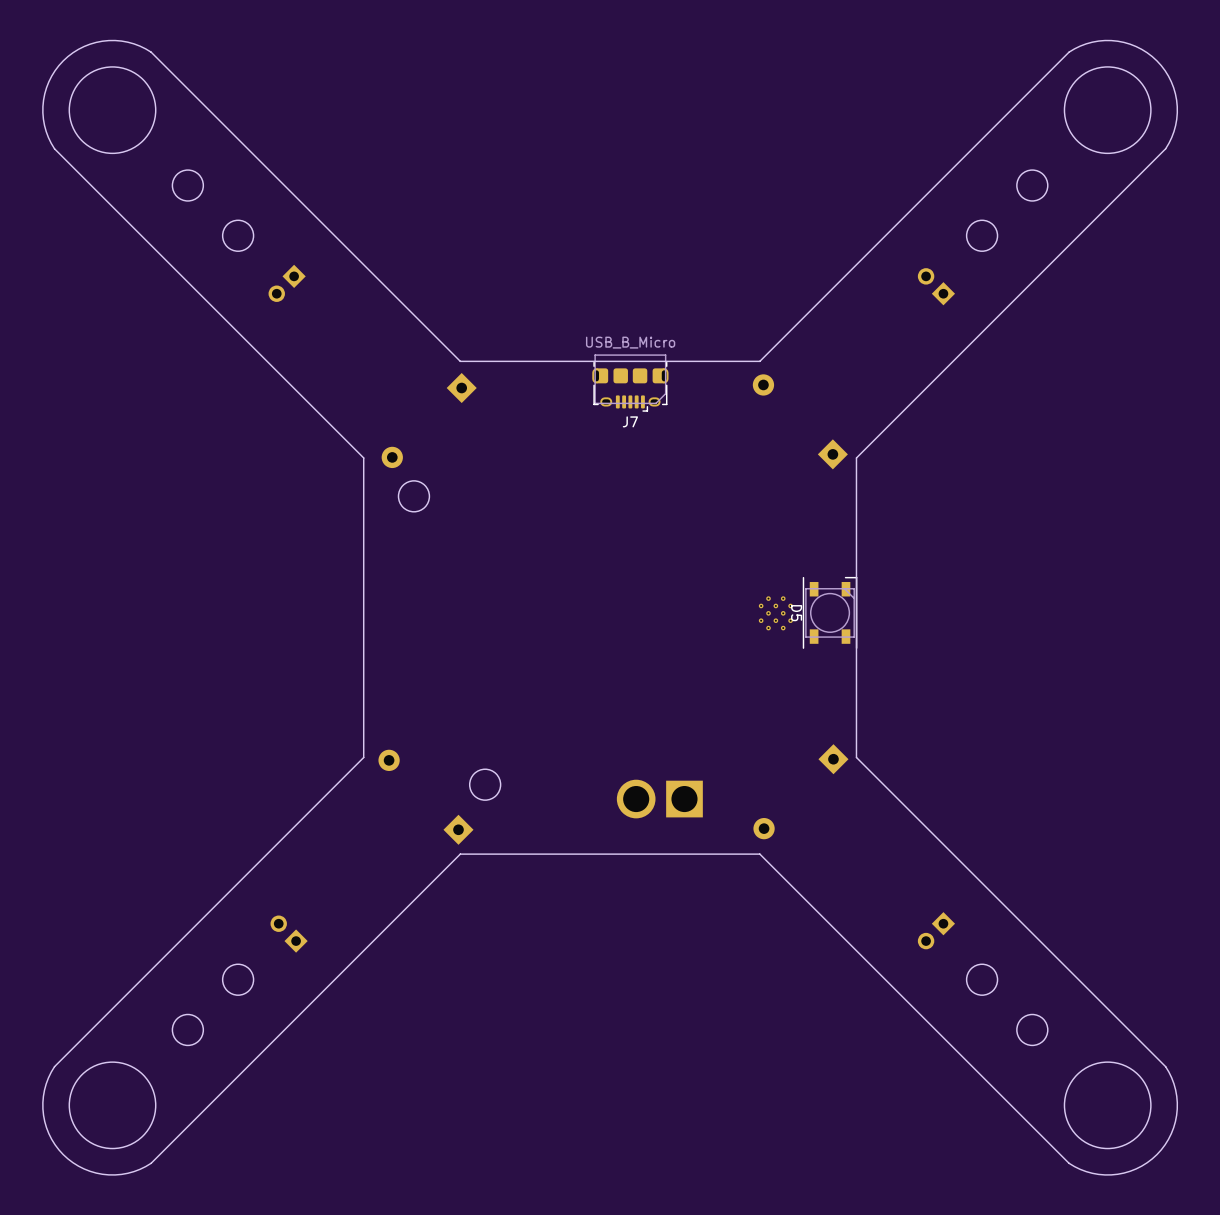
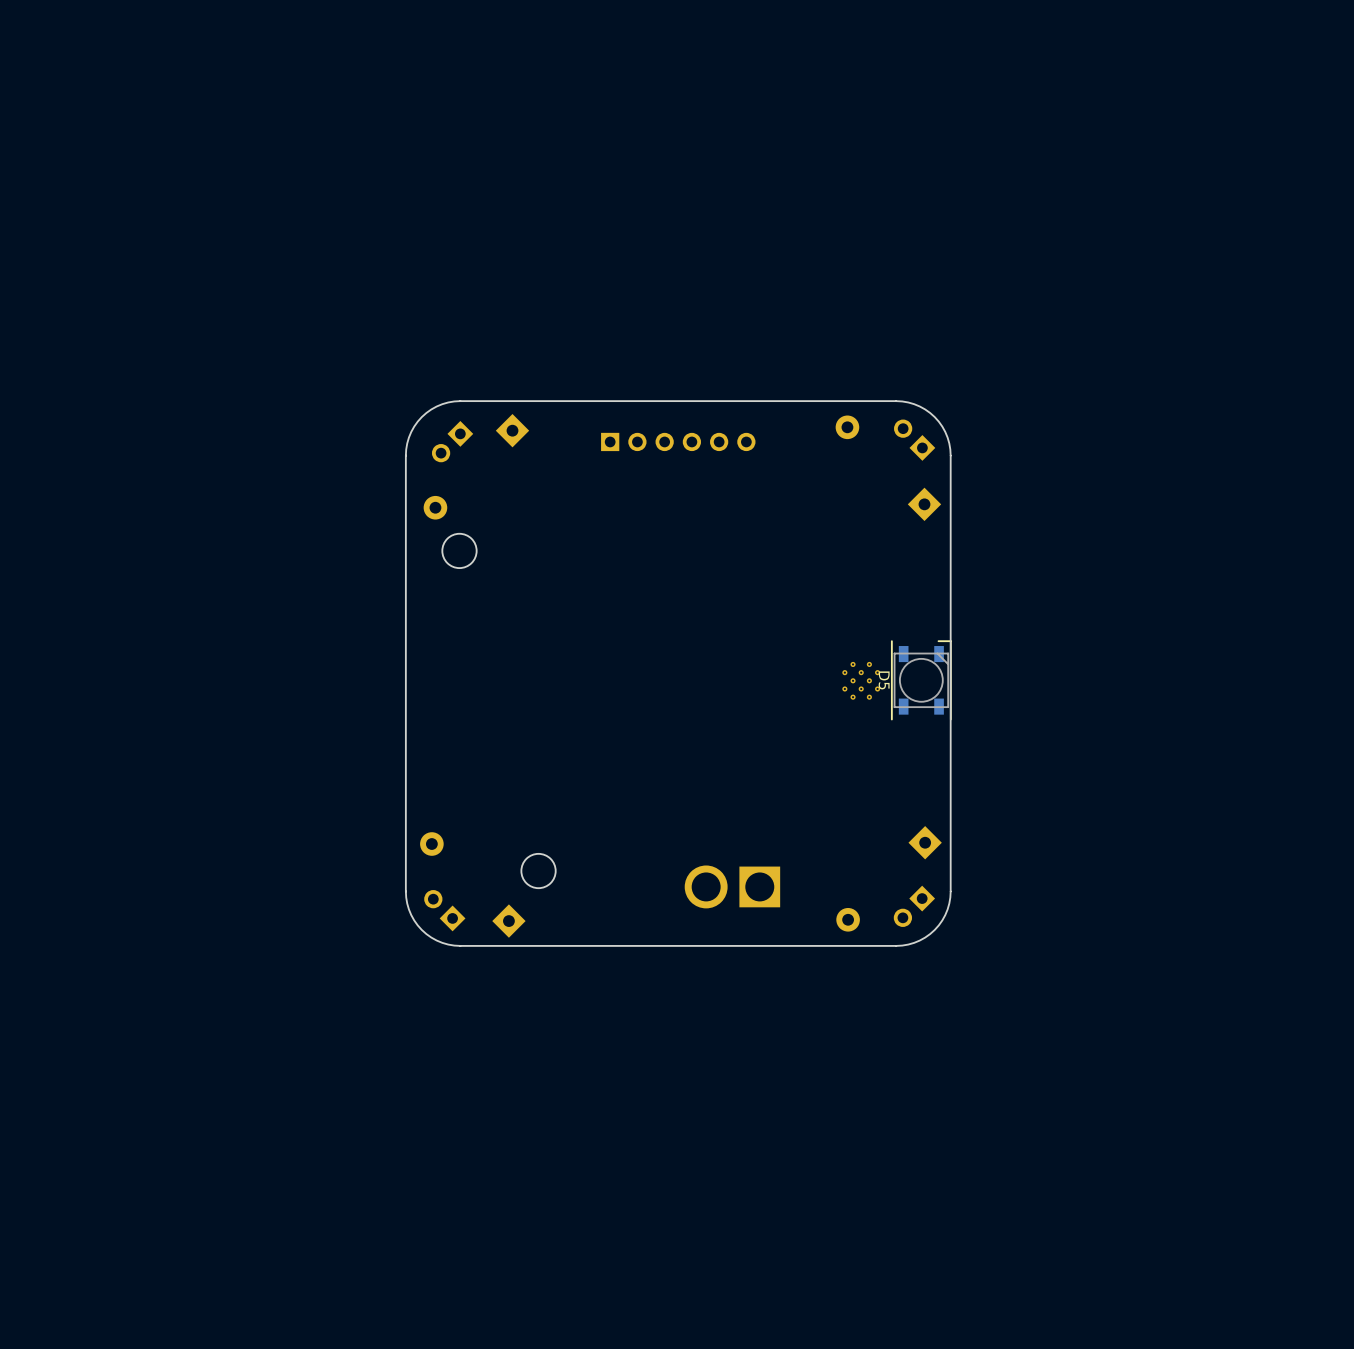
round board edge: [68, 66, 157, 154] -> none
round board edge: [1063, 66, 1152, 154] -> none
round board edge: [171, 169, 204, 202] -> none
round board edge: [1016, 169, 1049, 202] -> none
round board edge: [222, 219, 255, 252] -> none
round board edge: [966, 219, 999, 252] -> none
part position: (287, 283) -> (452, 441)
part position: (936, 286) -> (914, 440)
board edge: (460, 361) (151, 52) (139, 46) (121, 41) (96, 42) (73, 52) (55, 70) (46, 87) (42, 106) (44, 125) (54, 148) (363, 457) (363, 757) (54, 1066) (44, 1090) (43, 1115) (48, 1133) (63, 1154) (84, 1168) (102, 1174) (127, 1173) (151, 1163) (460, 854) (759, 854) (1069, 1163) (1092, 1173) (1111, 1174) (1130, 1171) (1147, 1162) (1165, 1144) (1175, 1121) (1176, 1096) (1171, 1077) (1165, 1066) (856, 757) -> (510, 401) (454, 401) (436, 406) (426, 412) (414, 426) (406, 449) (405, 891) (411, 915) (421, 929) (436, 940) (460, 945) (902, 945) (925, 937) (934, 929) (945, 915) (950, 897) (950, 840)
board edge: (759, 361) (1069, 52) (1092, 42) (1117, 41) (1136, 46) (1156, 60) (1171, 81) (1176, 100) (1175, 125) (1165, 148) (856, 457) -> (843, 401) (908, 402) (919, 406) (934, 417) (942, 426) (949, 443) (950, 508)
J7: USB_B_Micro (630, 383) -> none
part: none -> (678, 441)
part position: (936, 930) -> (914, 906)
part position: (289, 934) -> (444, 910)
round board edge: [222, 963, 255, 996] -> none
round board edge: [966, 963, 999, 996] -> none
round board edge: [171, 1014, 204, 1046] -> none
round board edge: [1016, 1014, 1049, 1046] -> none
round board edge: [68, 1061, 157, 1150] -> none
round board edge: [1063, 1061, 1152, 1150] -> none

